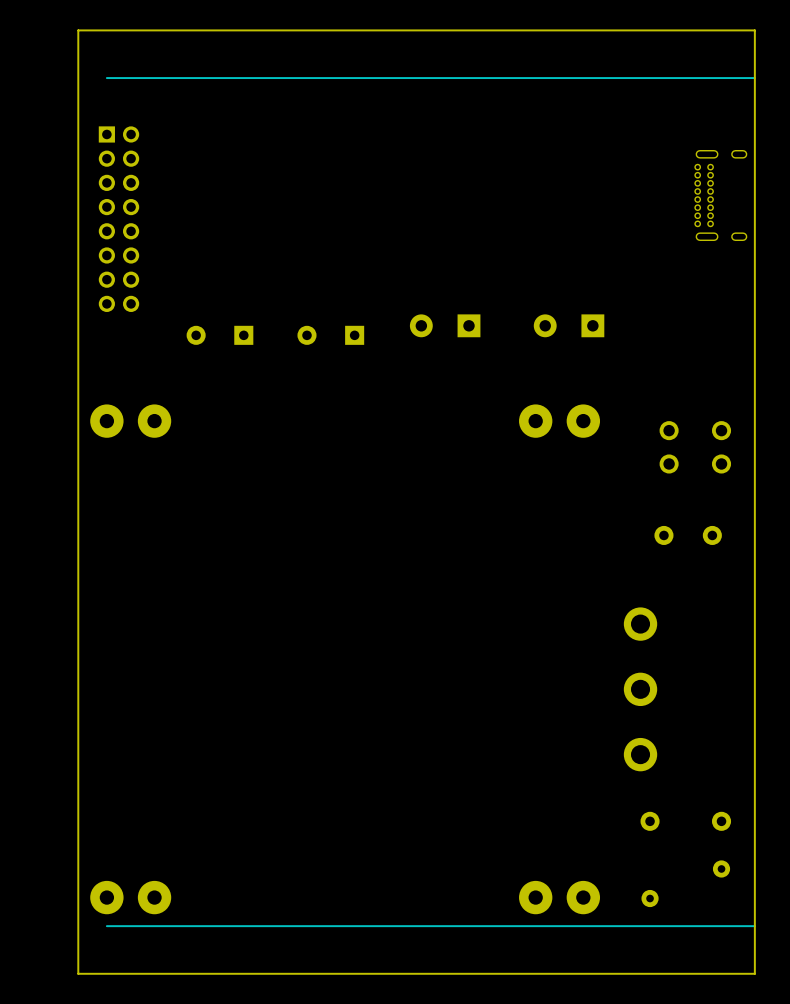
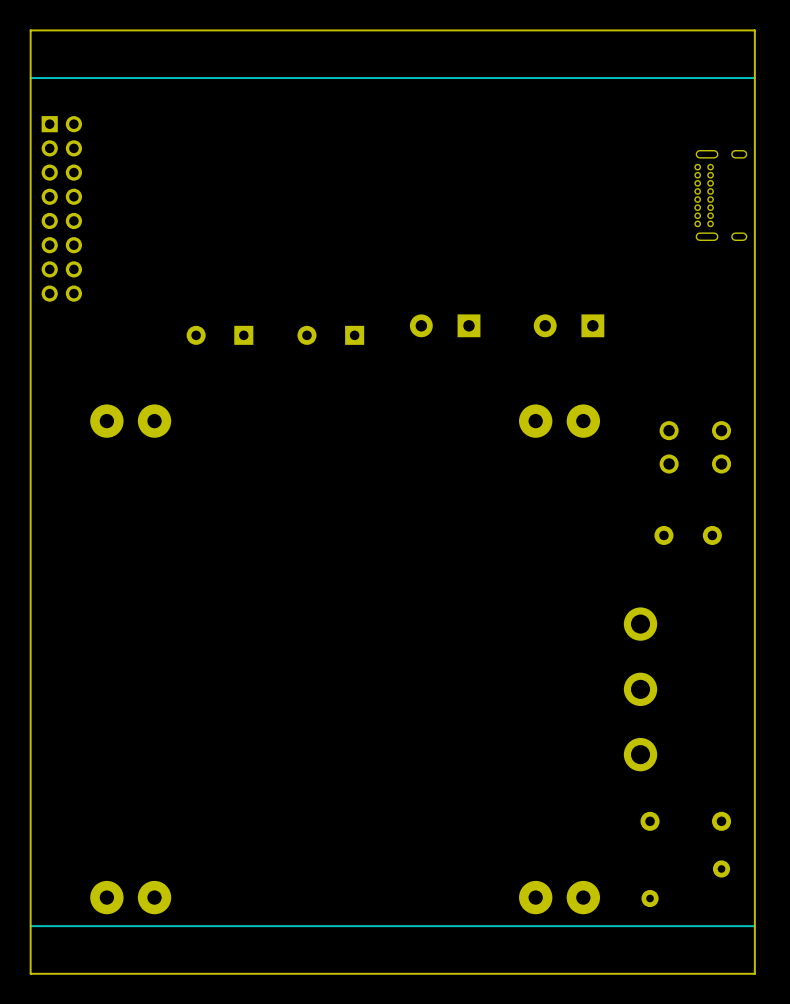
board edge: (78, 30) (78, 973) -> (78, 30) (30, 30) (30, 973) (78, 973)
line: none -> (106, 78) (30, 78)
part position: (118, 219) -> (61, 208)
line: none -> (106, 926) (30, 926)

